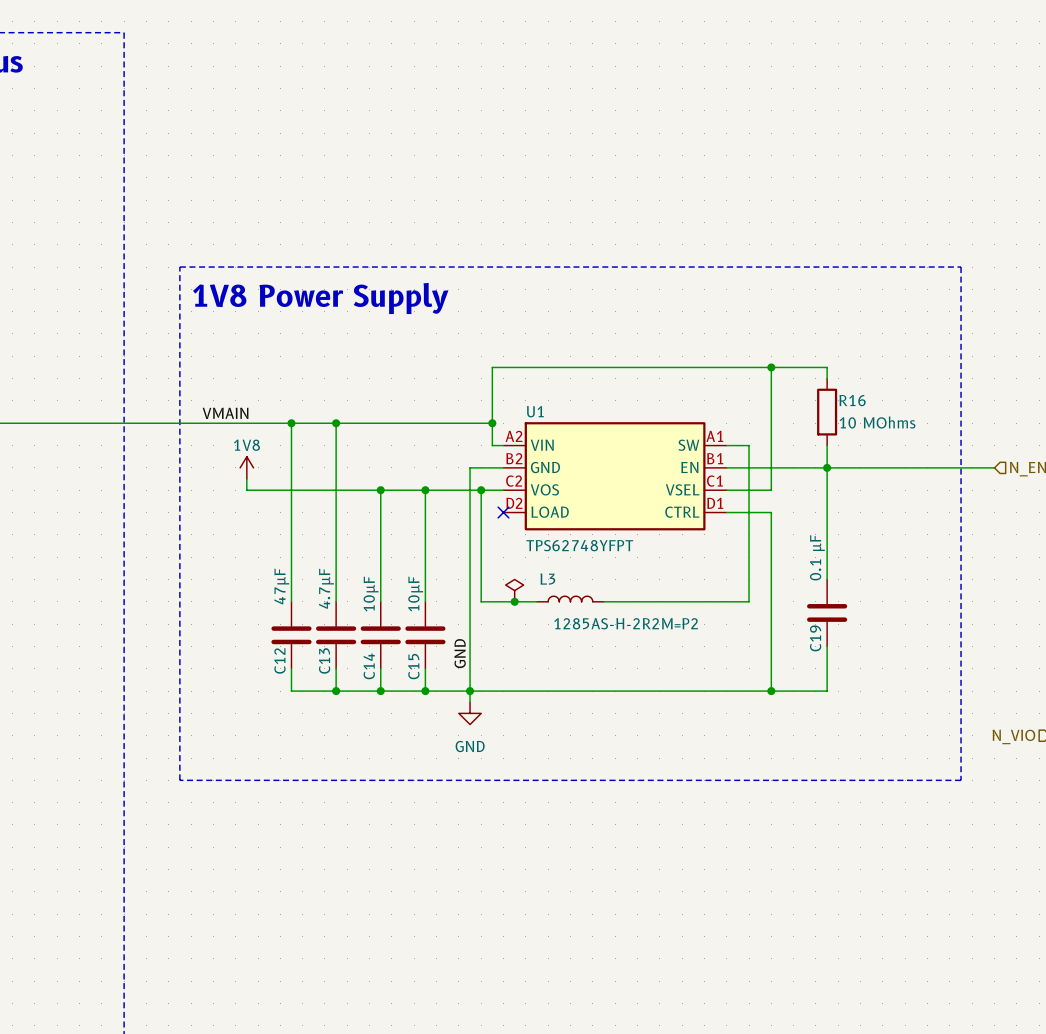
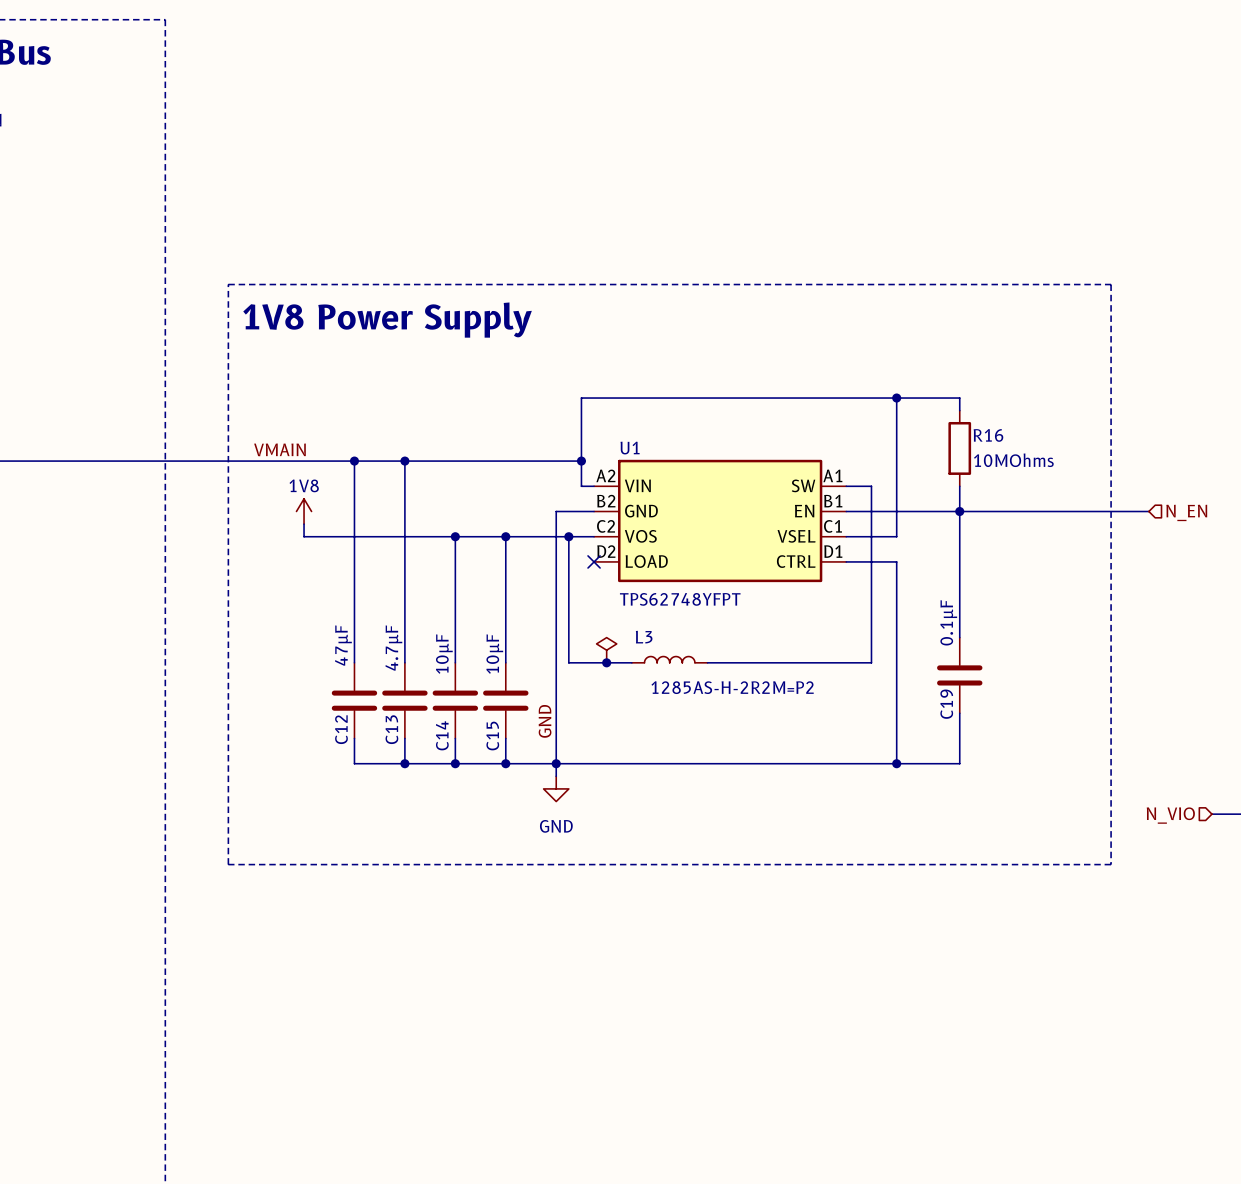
R16 value: 10 MOhms (877, 422) -> 10MOhms (1013, 460)
C19 value: 0.1 µF (817, 557) -> 0.1µF (948, 622)

